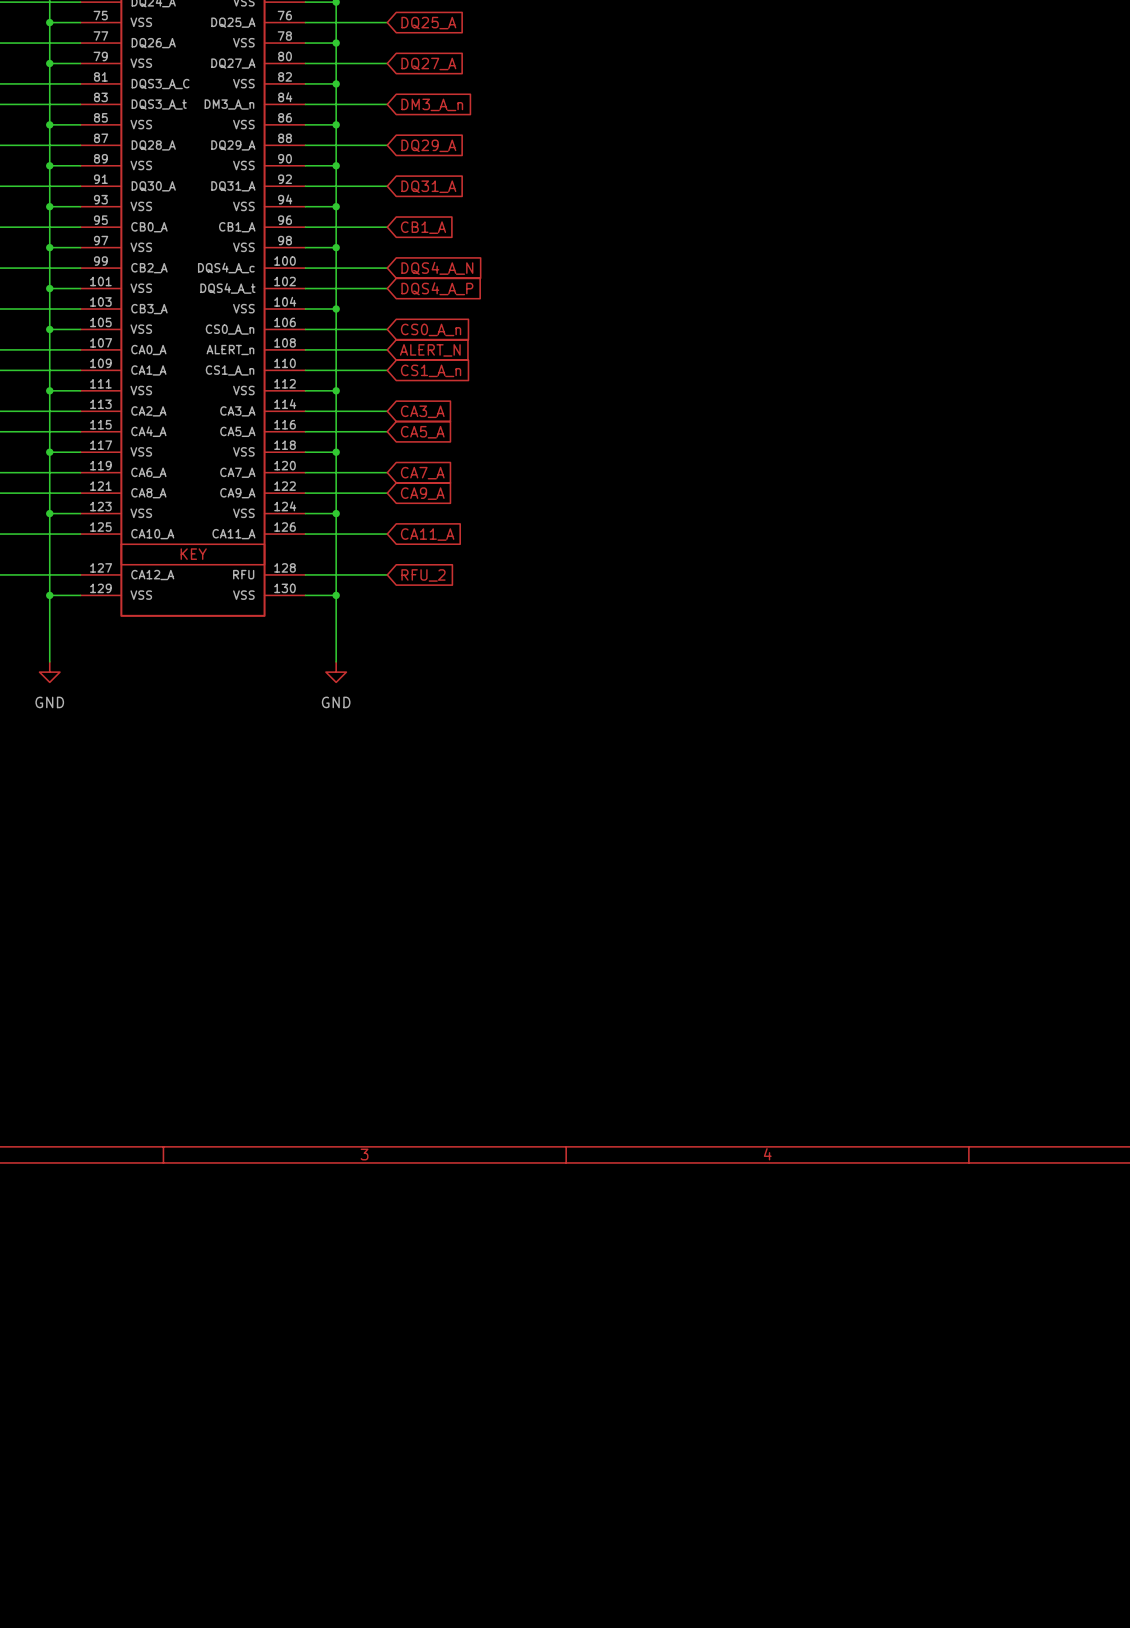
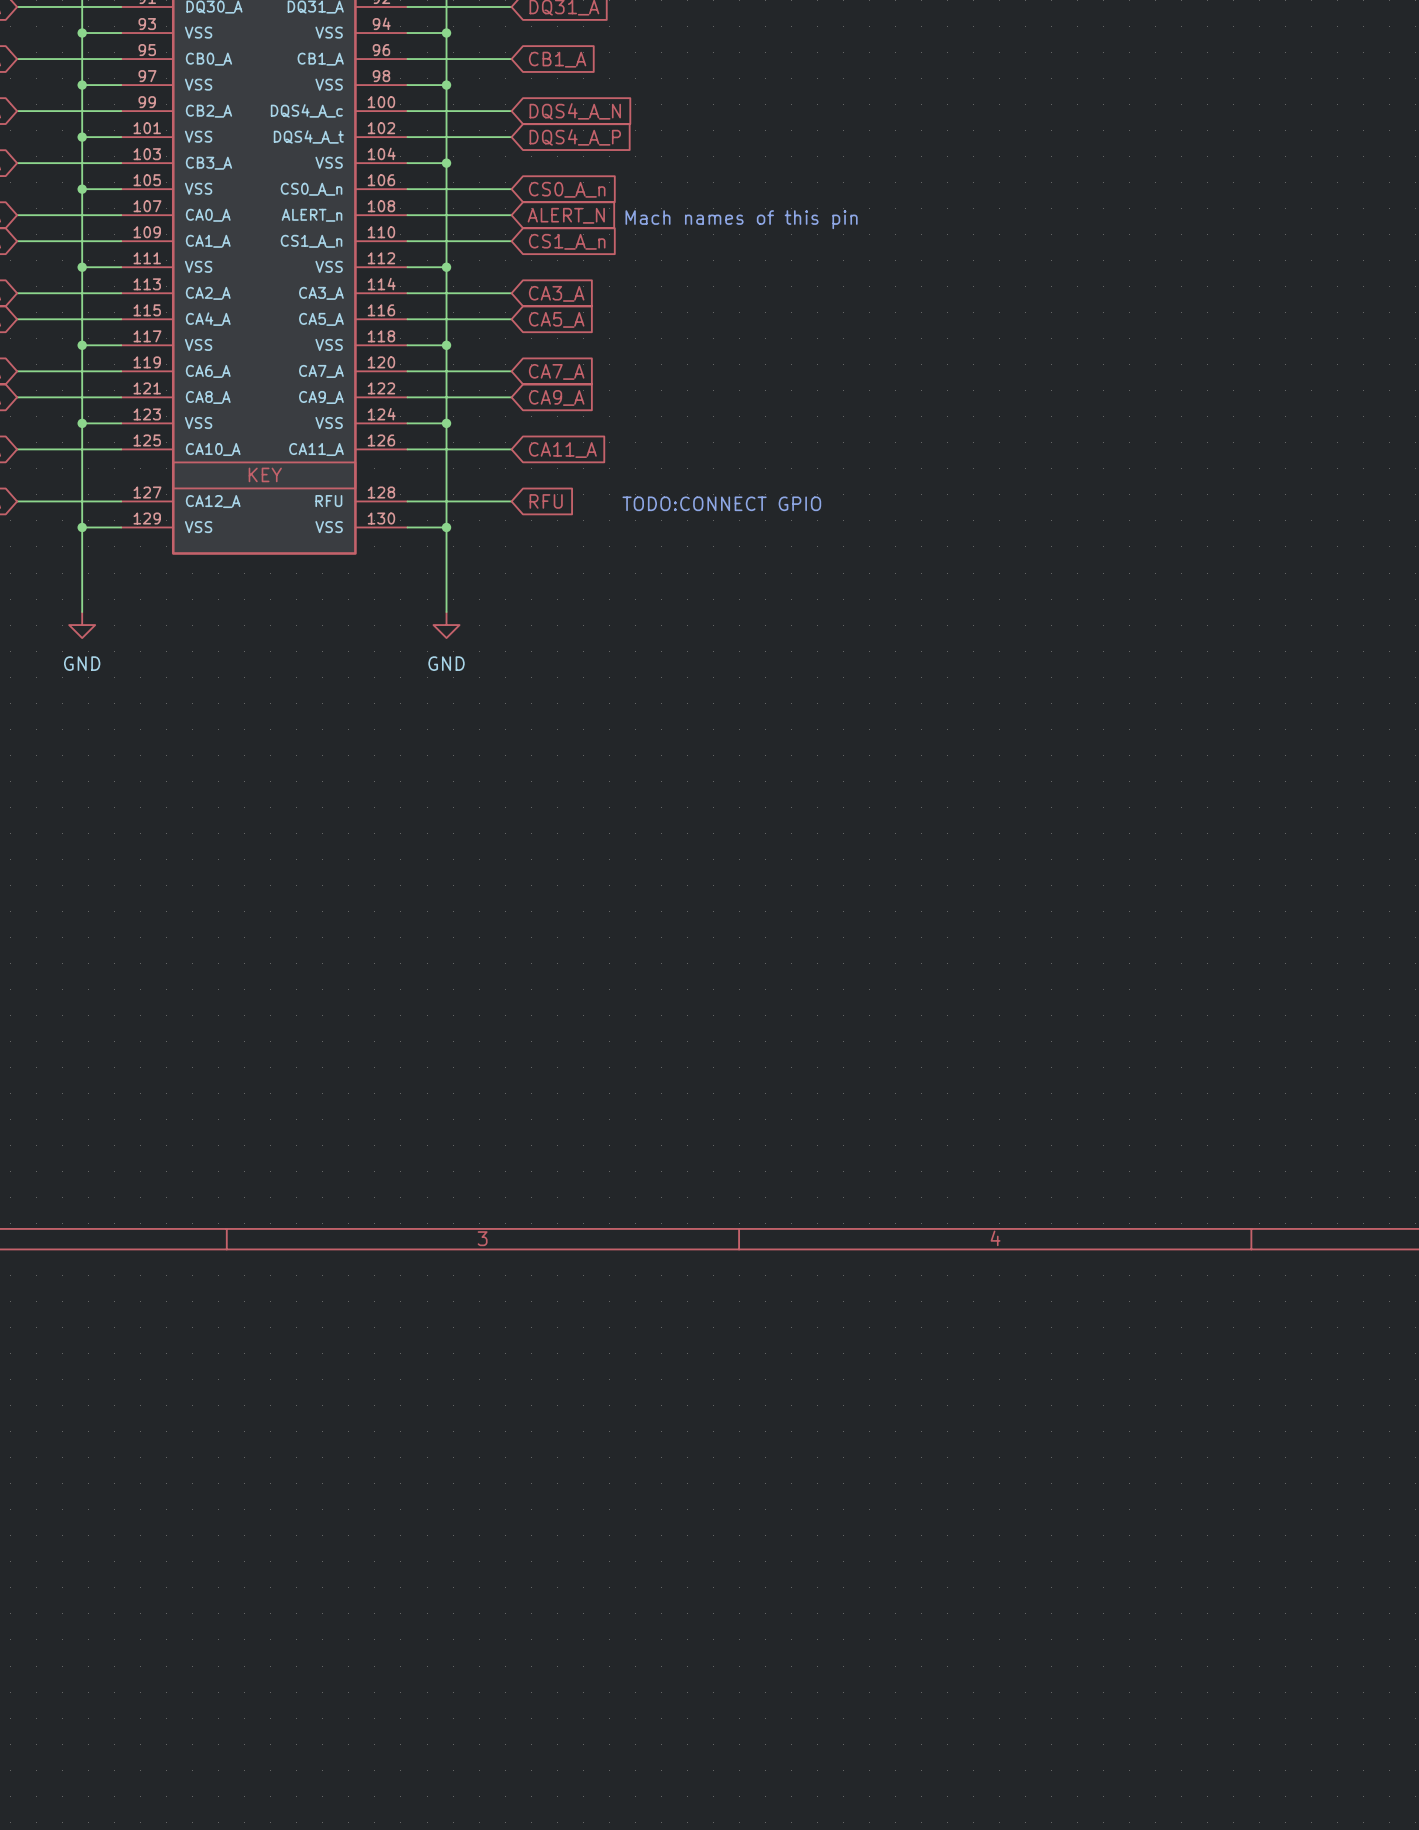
text: none -> Mach names of this pin (741, 219)
global label: RFU_2 (423, 575) -> RFU (546, 501)
text: none -> TODO:CONNECT GPIO (721, 503)

